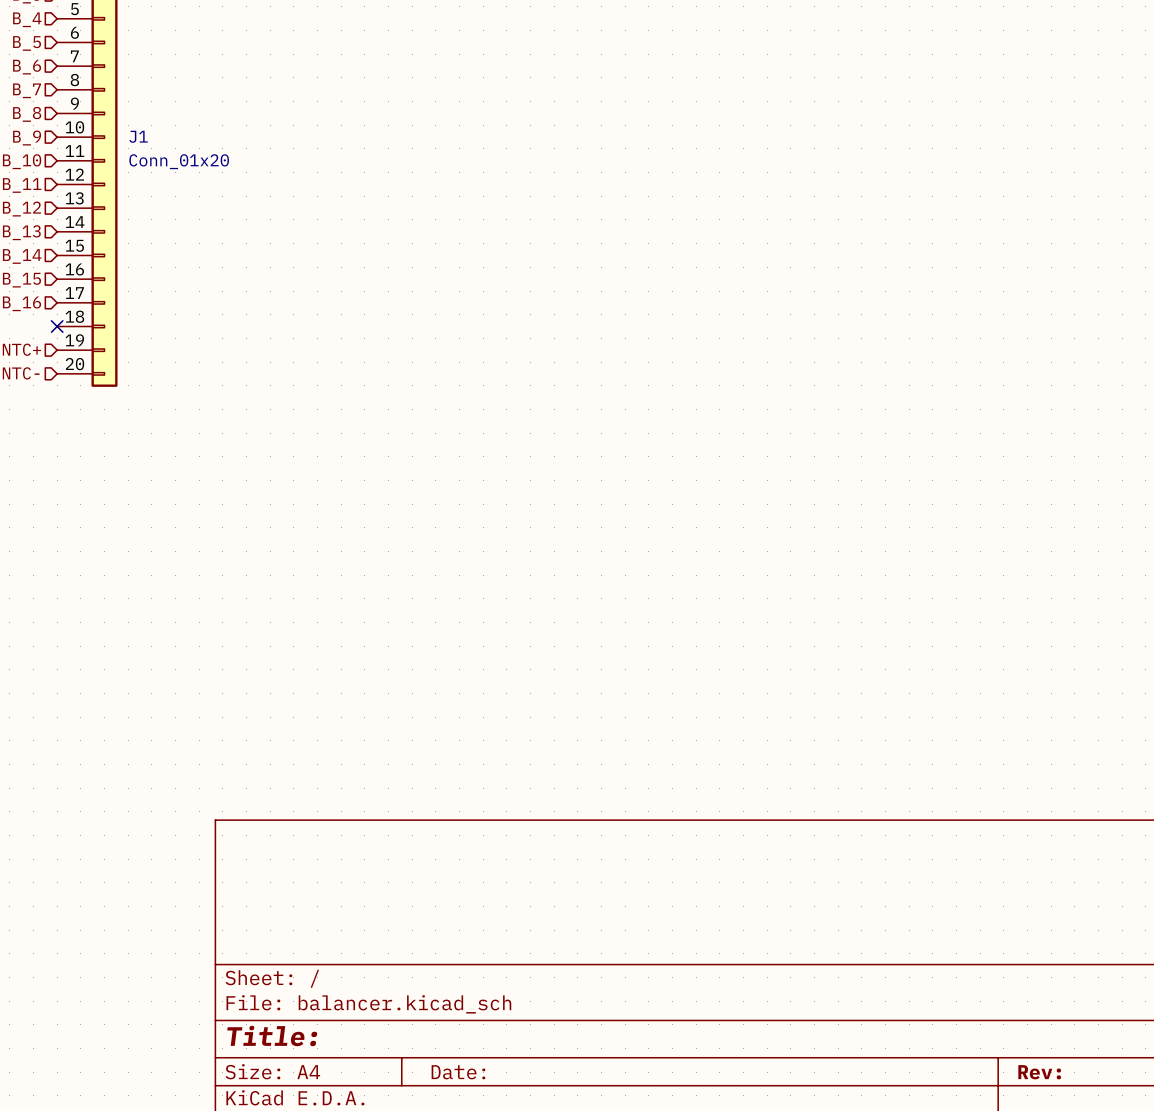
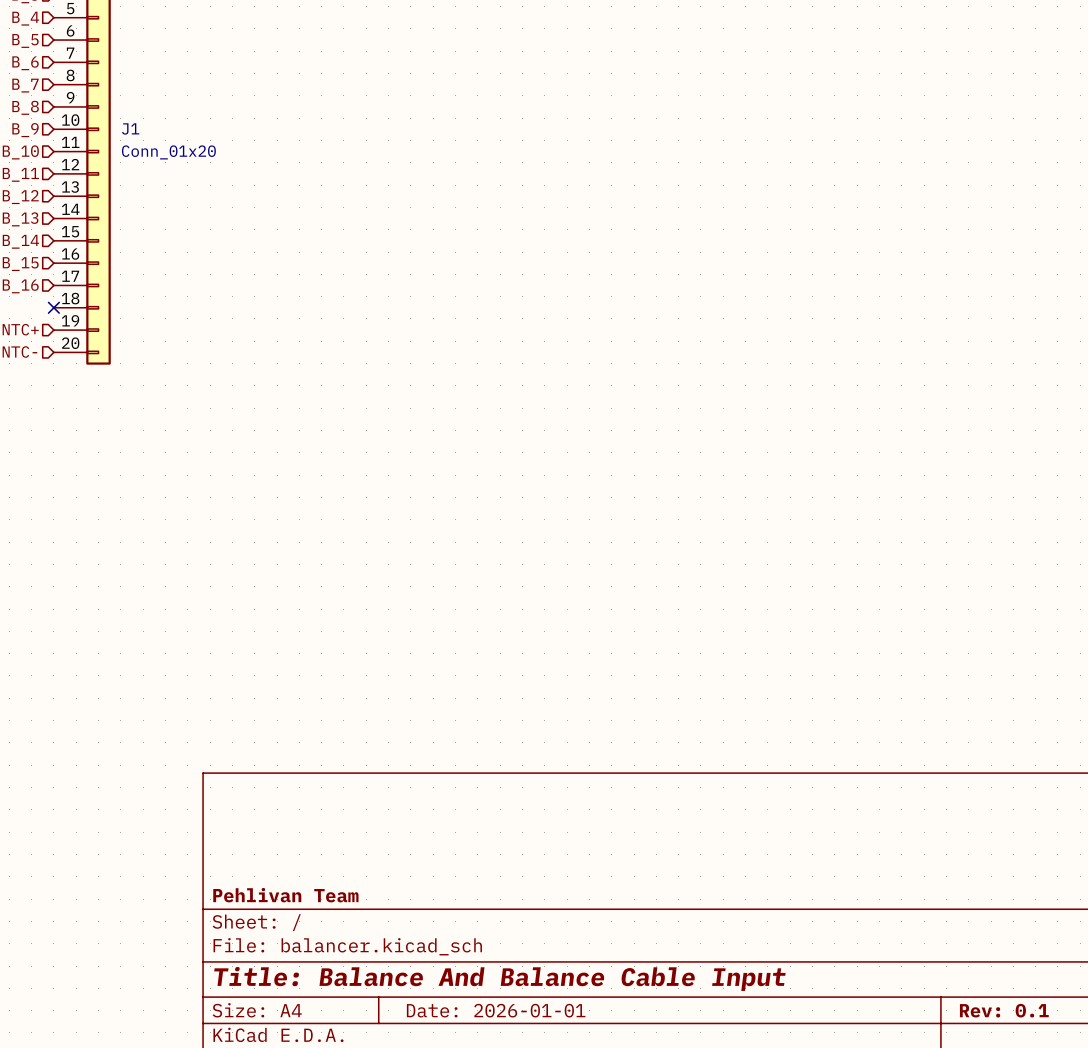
title block: none -> Pehlivan Team (285, 895)
title block: Title: (272, 1036) -> Title: Balance And Balance Cable Input (499, 978)
title block: Date: (458, 1072) -> Date: 2026-01-01 (496, 1010)
title block: Rev: (1039, 1072) -> Rev: 0.1 (1004, 1010)

